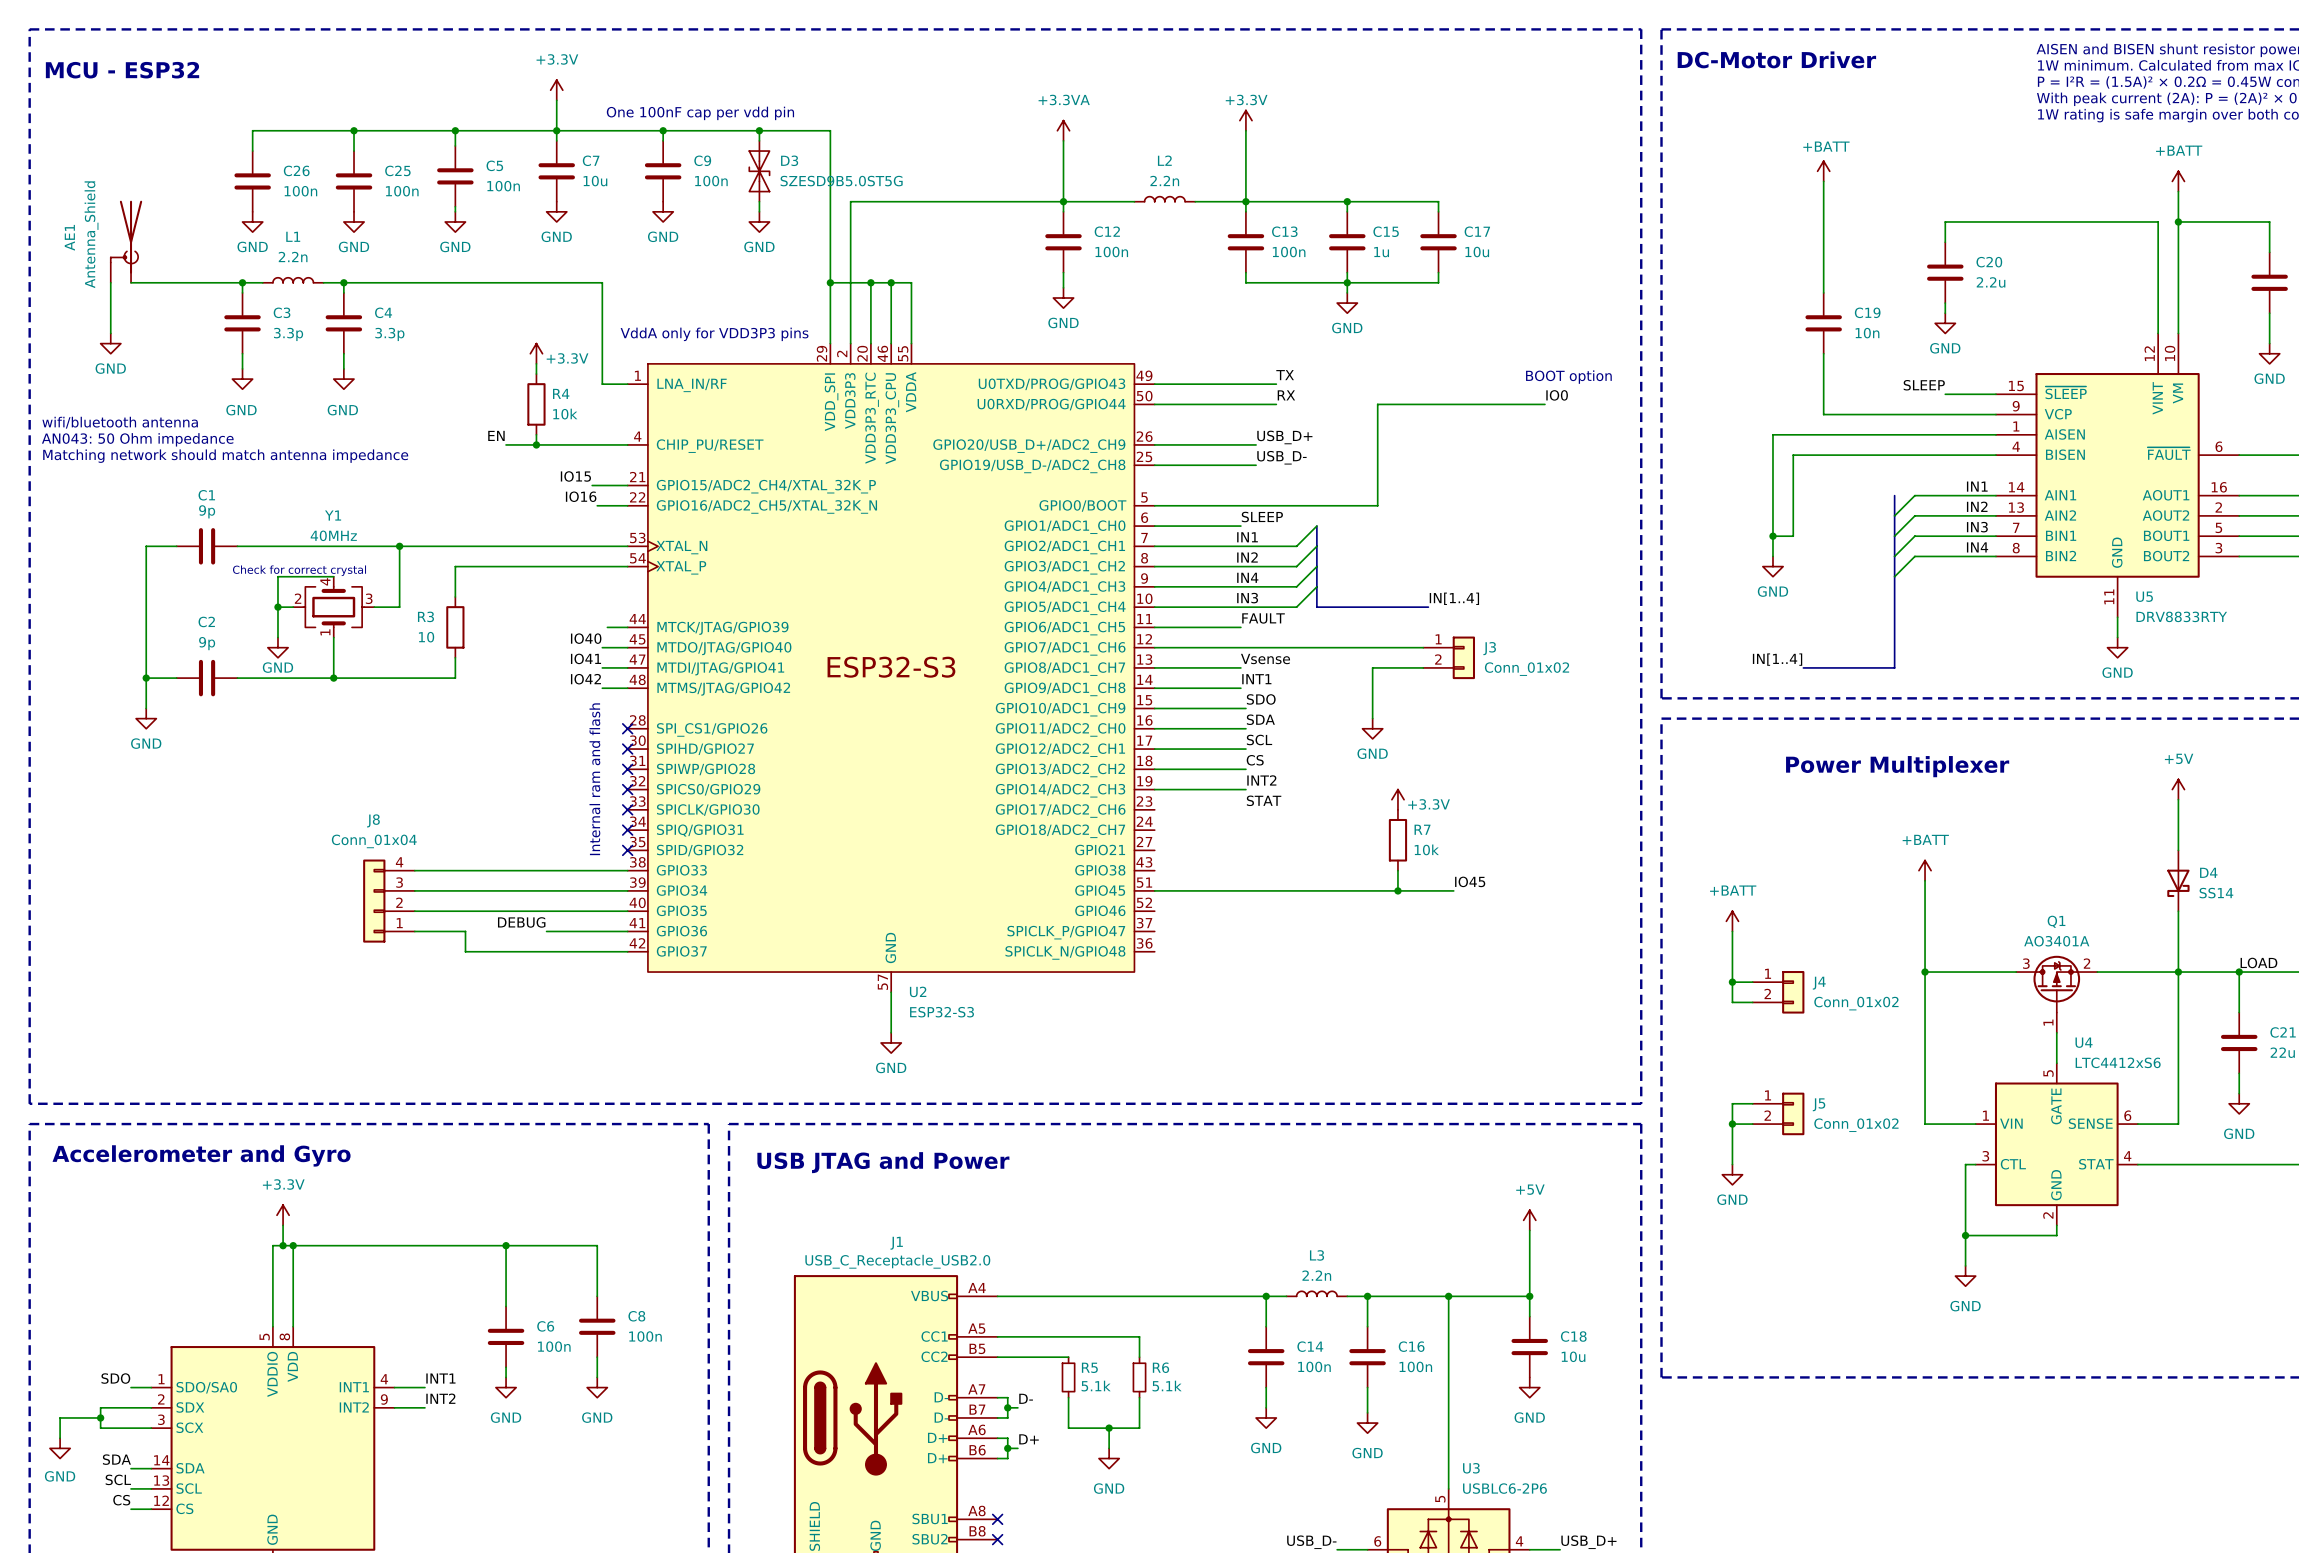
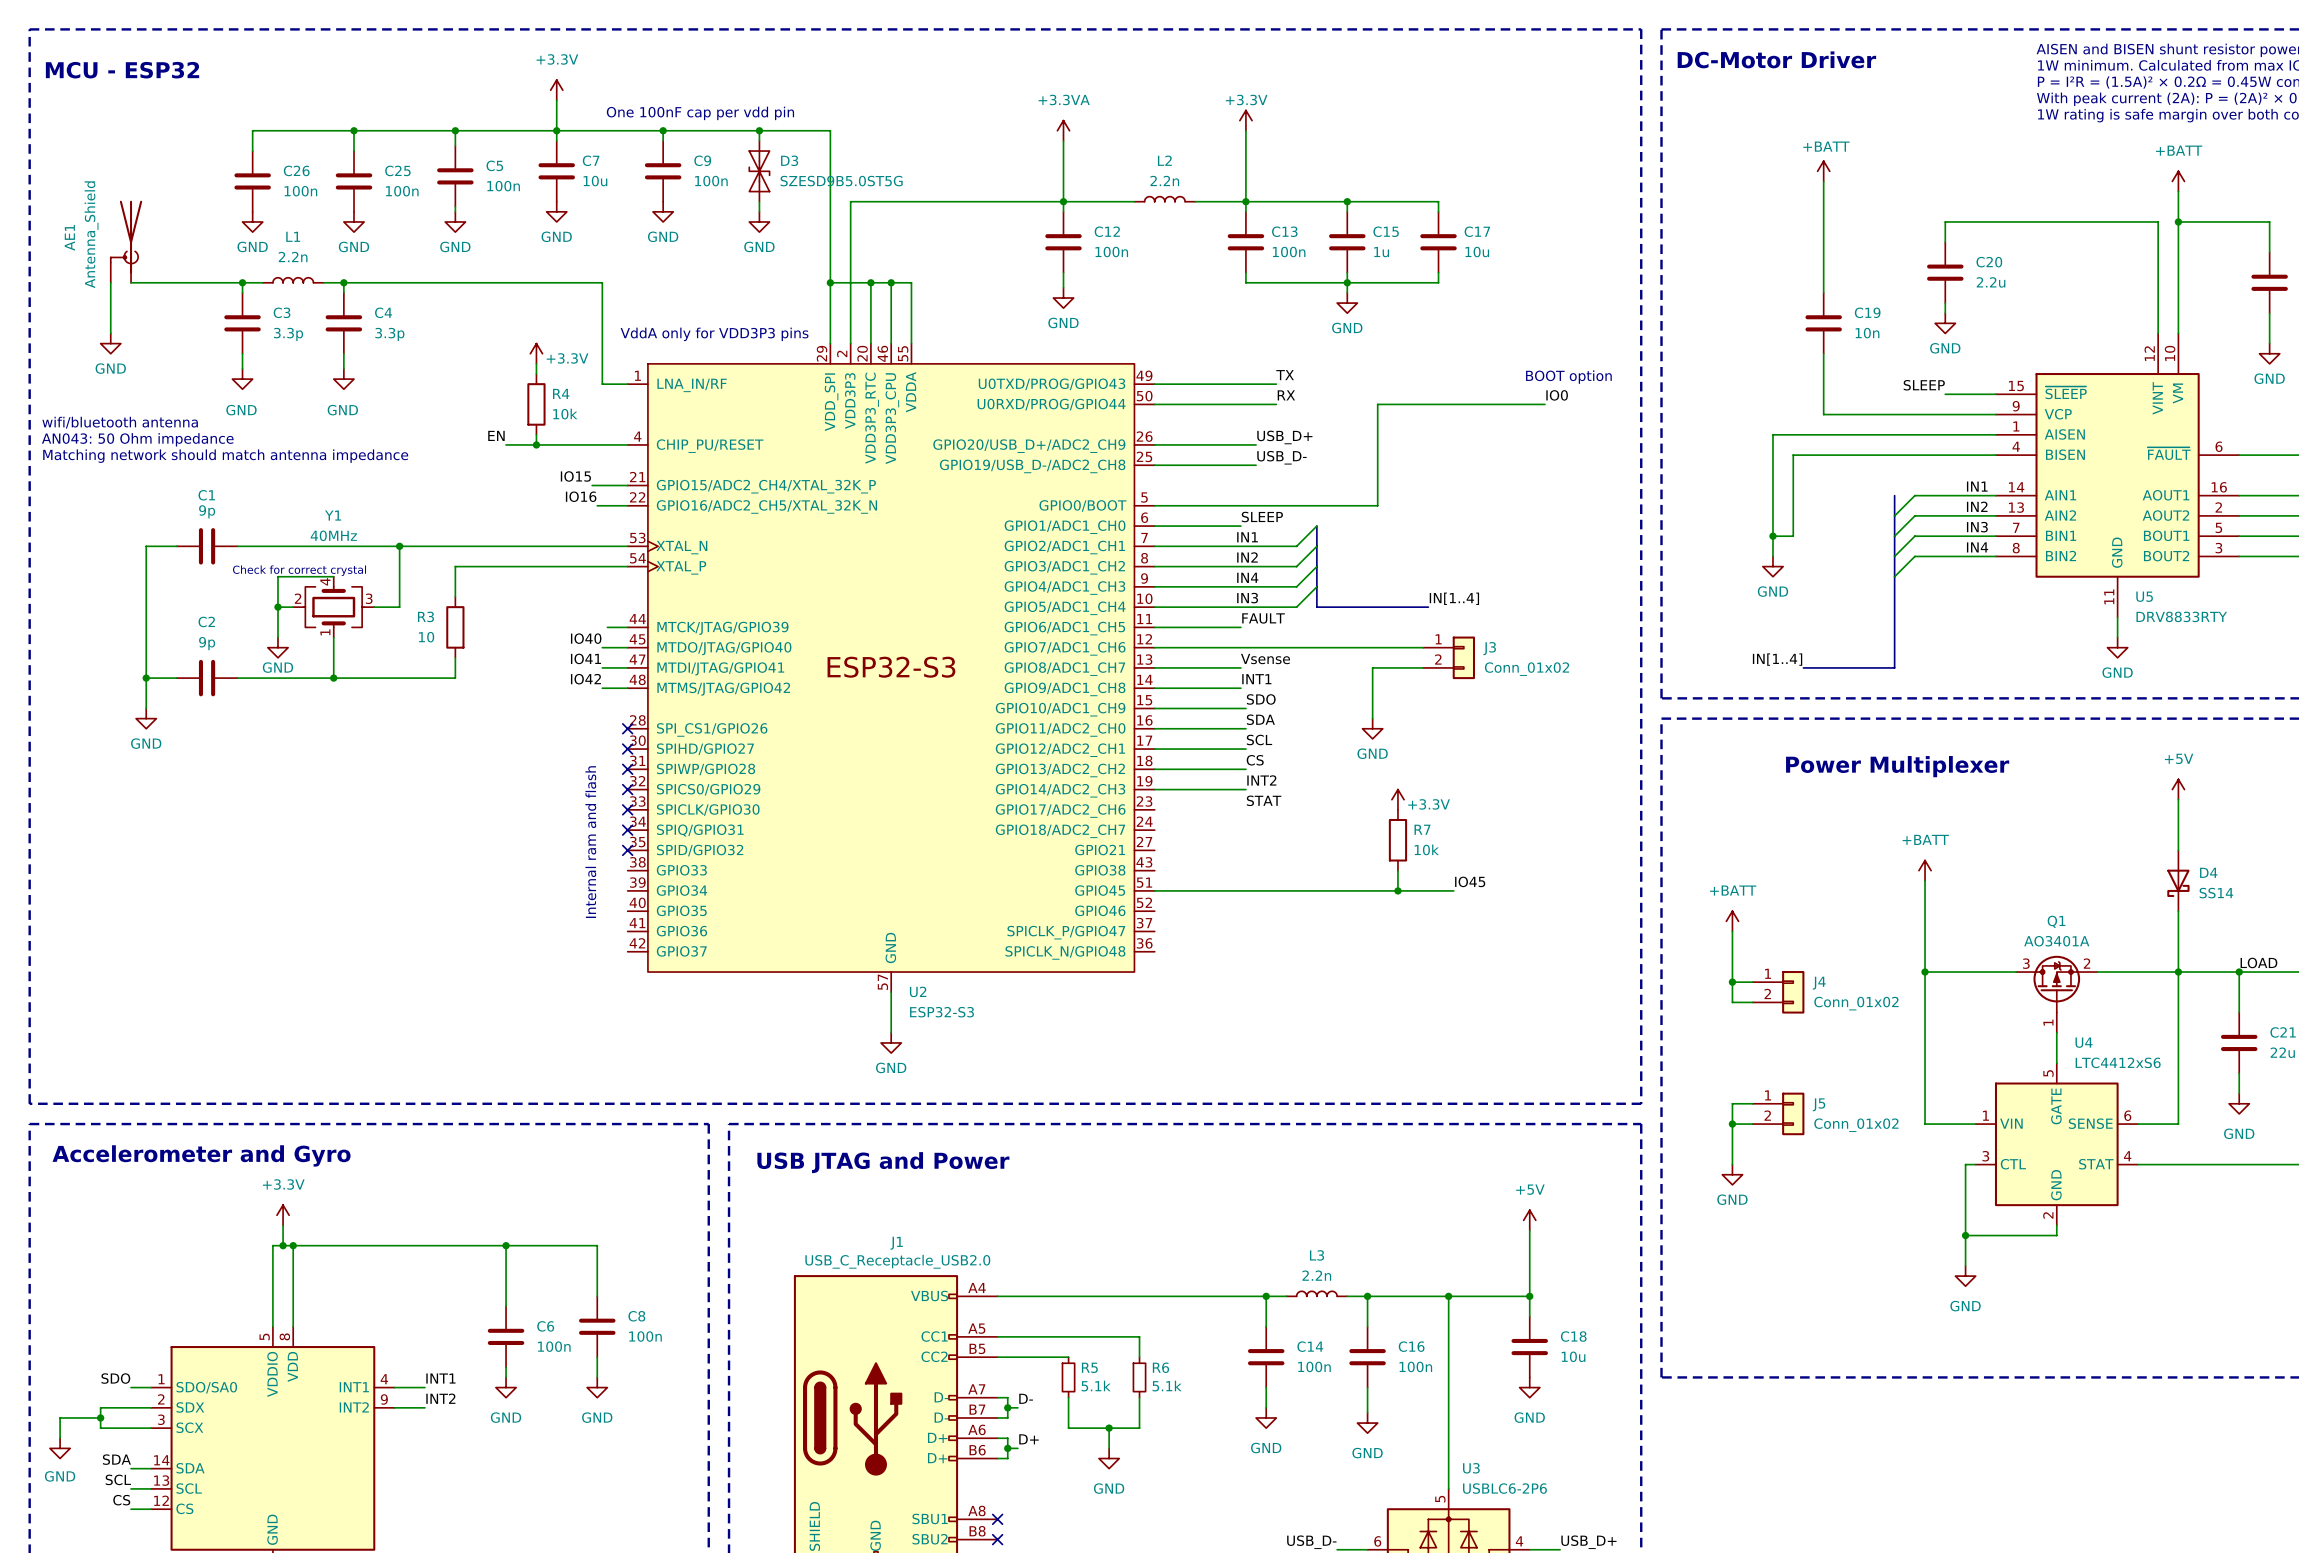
text position: Internal ram and flash (594, 779) -> Internal ram and flash (590, 842)
wire: (414, 870) (627, 870) -> none
wire: (414, 890) (627, 890) -> none
J8: Conn_01x04 (388, 901) -> none
wire: (414, 911) (627, 911) -> none
label: DEBUG (521, 922) -> none
wire: (414, 931) (465, 931) (465, 951) (627, 951) -> none
wire: (546, 931) (627, 931) -> none

